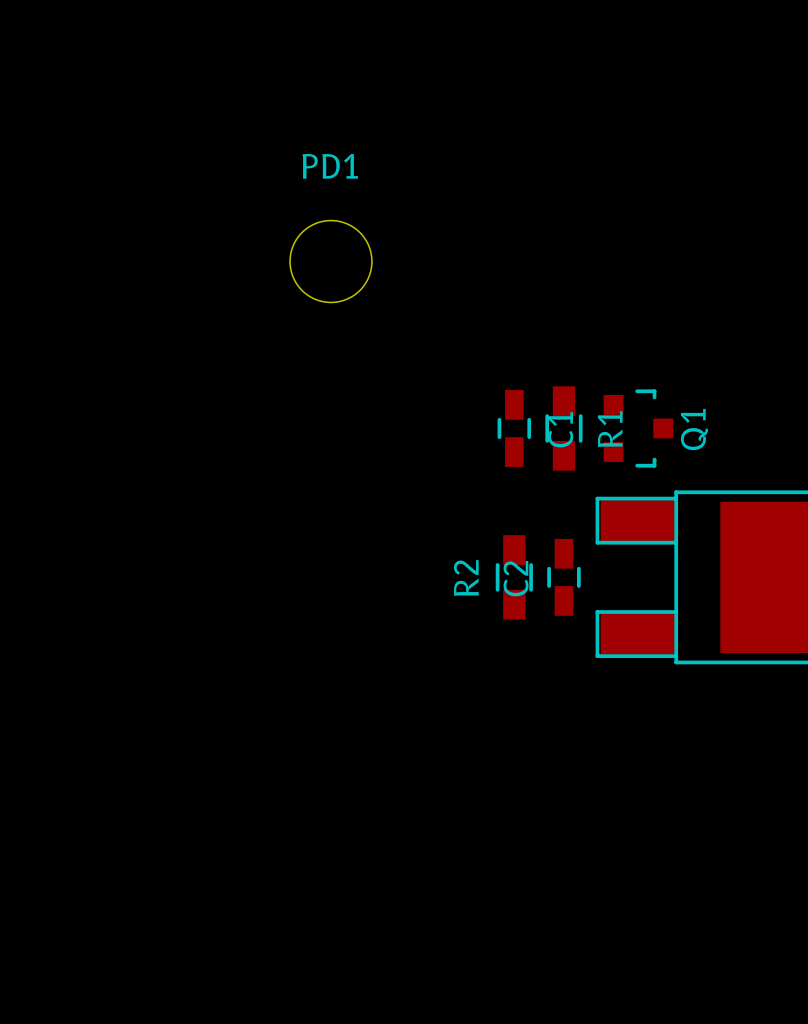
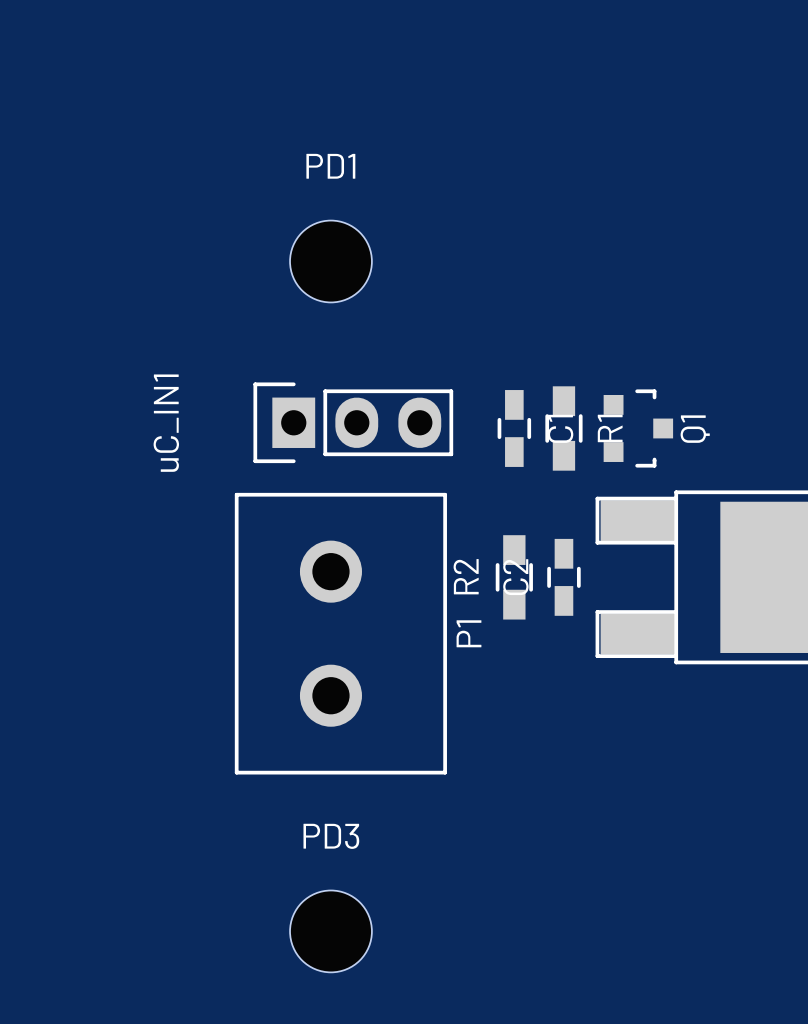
uC_IN1: none -> (353, 422)
P1: none -> (340, 633)
PD3: none -> (330, 931)

